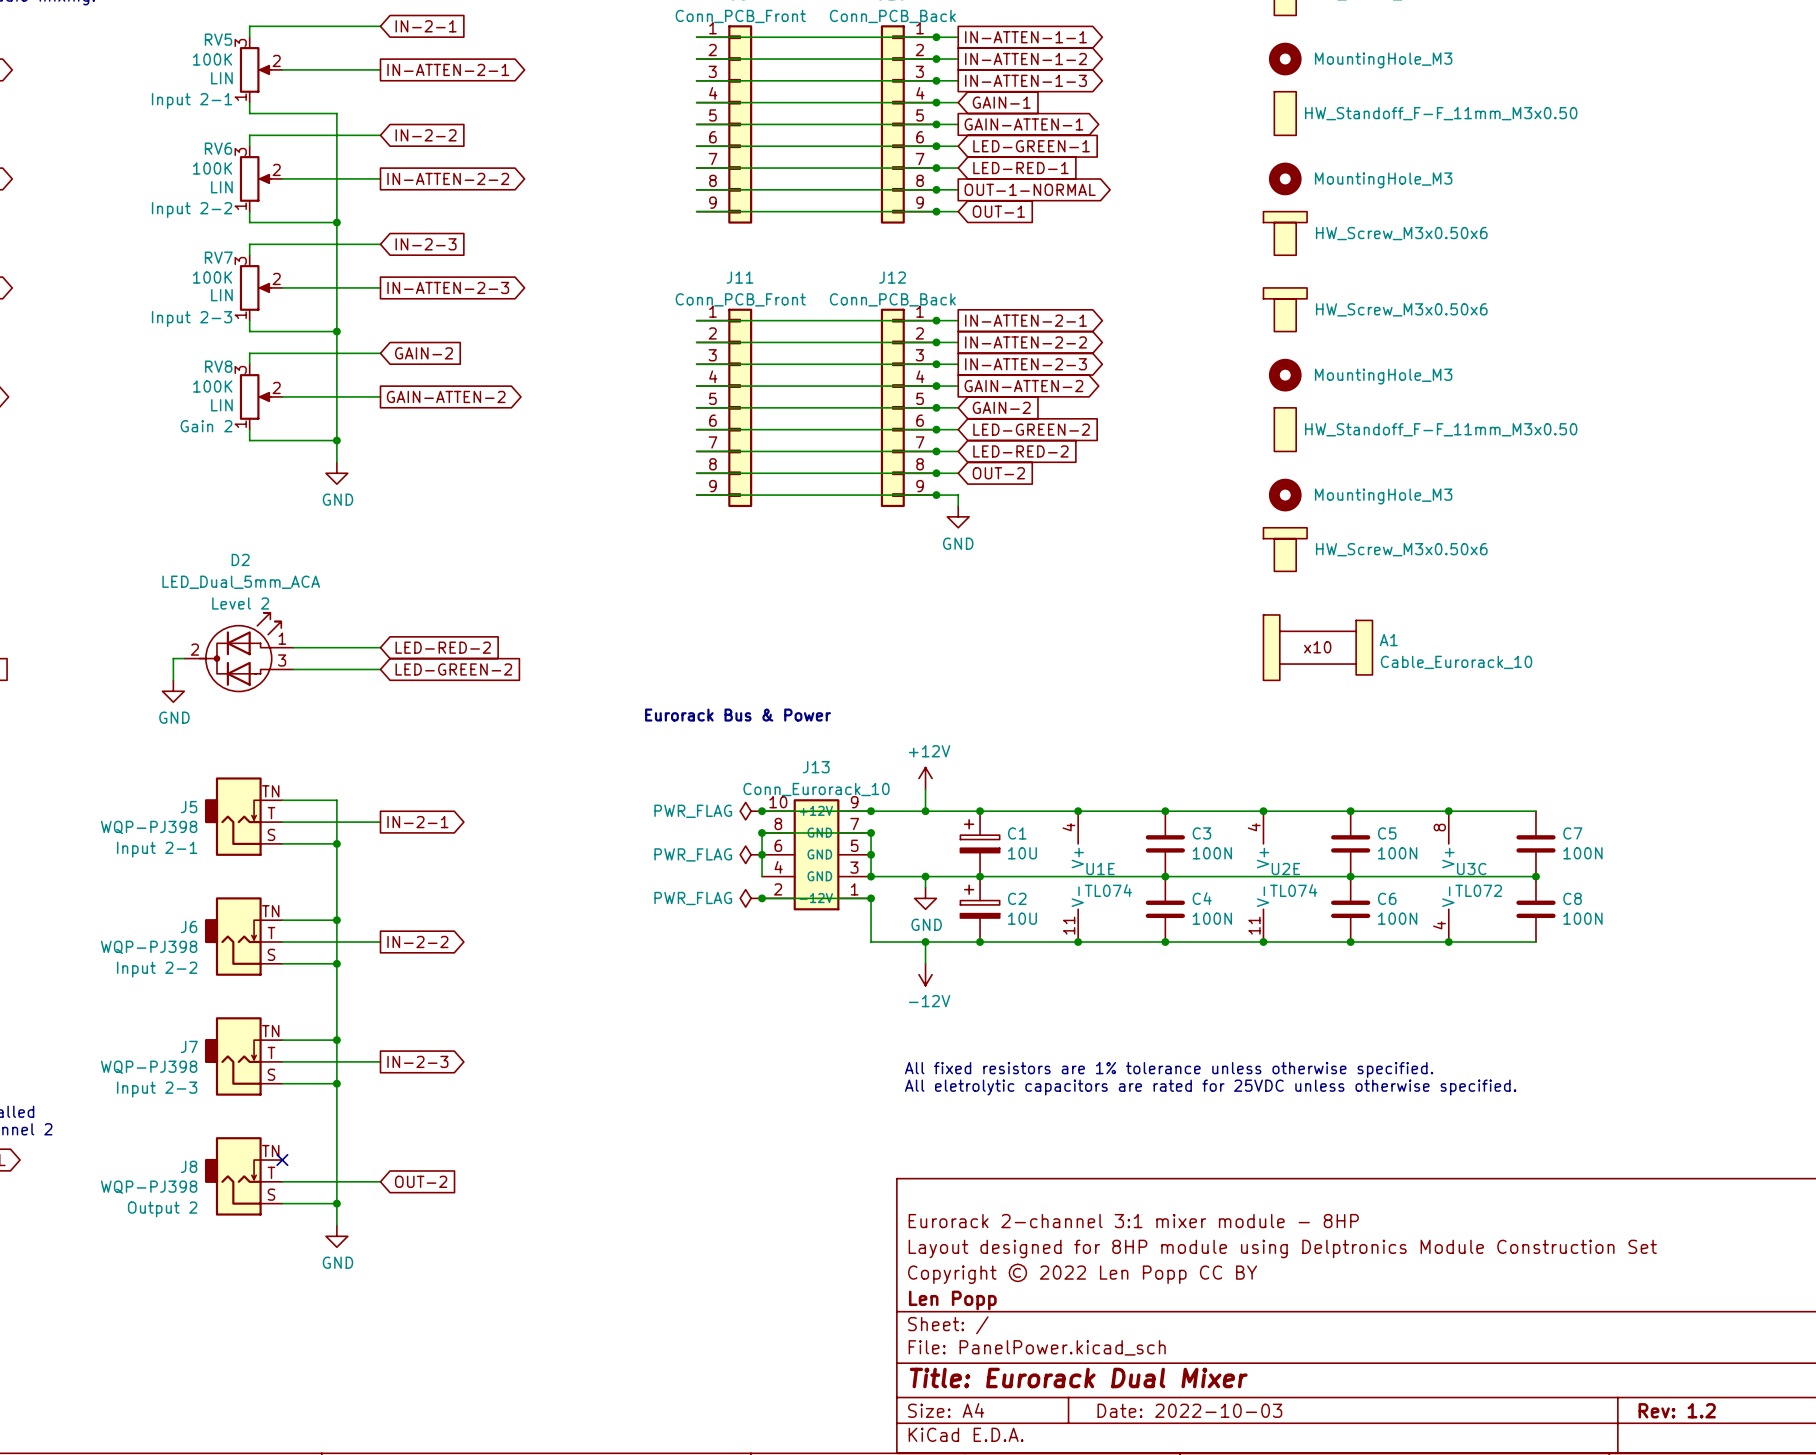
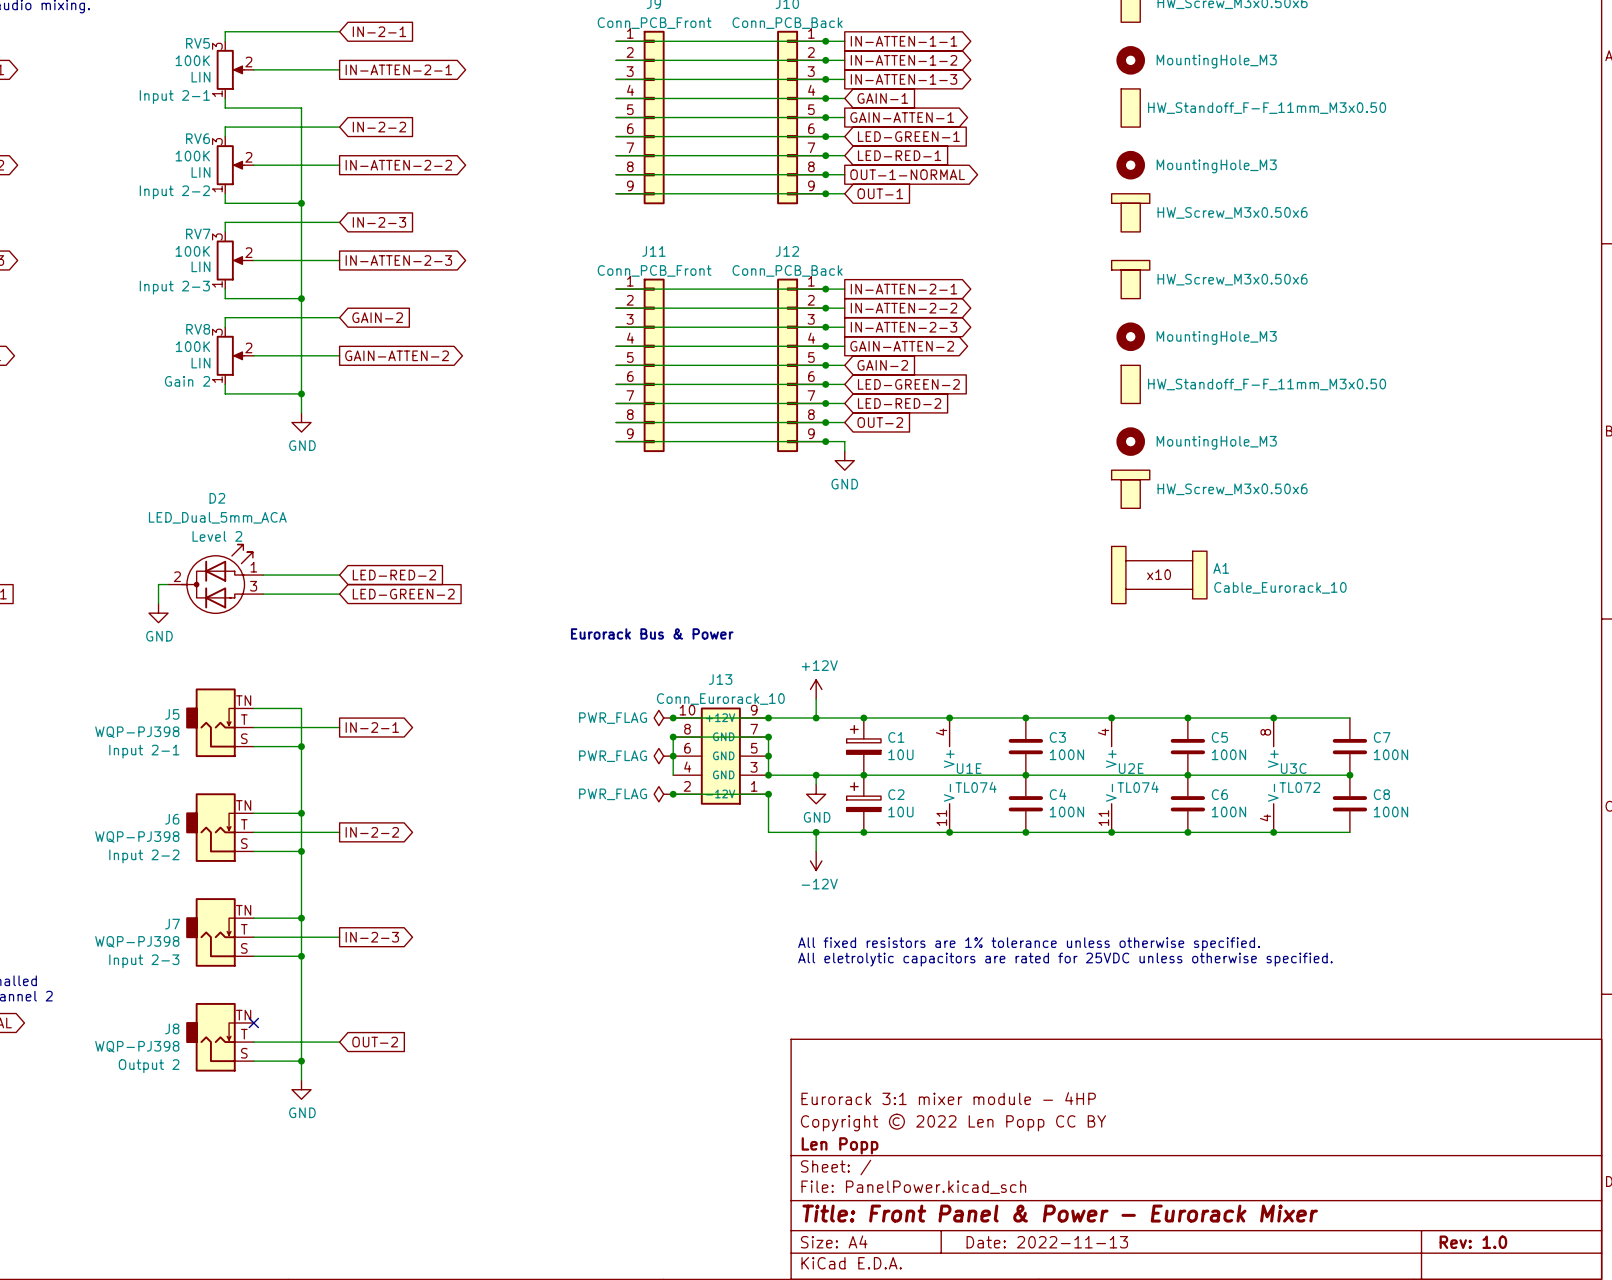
title block: Eurorack 2-channel 3:1 mixer module - 8HP (1133, 1221) -> none
title block: Layout designed for 8HP module using Delptronics Module Construction Set (1282, 1248) -> Eurorack 3:1 mixer module - 4HP (948, 1098)
title block: Title: Eurorack Dual Mixer (1078, 1377) -> Title: Front Panel & Power - Eurorack Mixer (1060, 1213)
title block: Date: 2022-10-03 (1189, 1410) -> Date: 2022-11-13 (1047, 1242)
title block: Rev: 1.2 (1677, 1410) -> Rev: 1.0 (1473, 1242)

